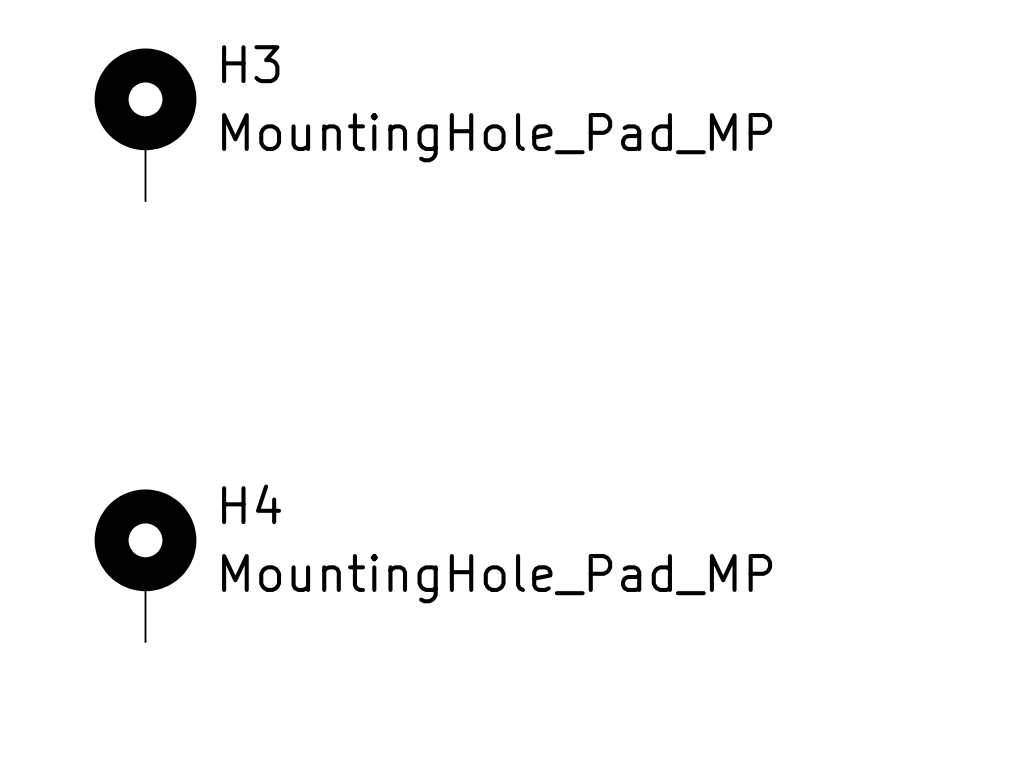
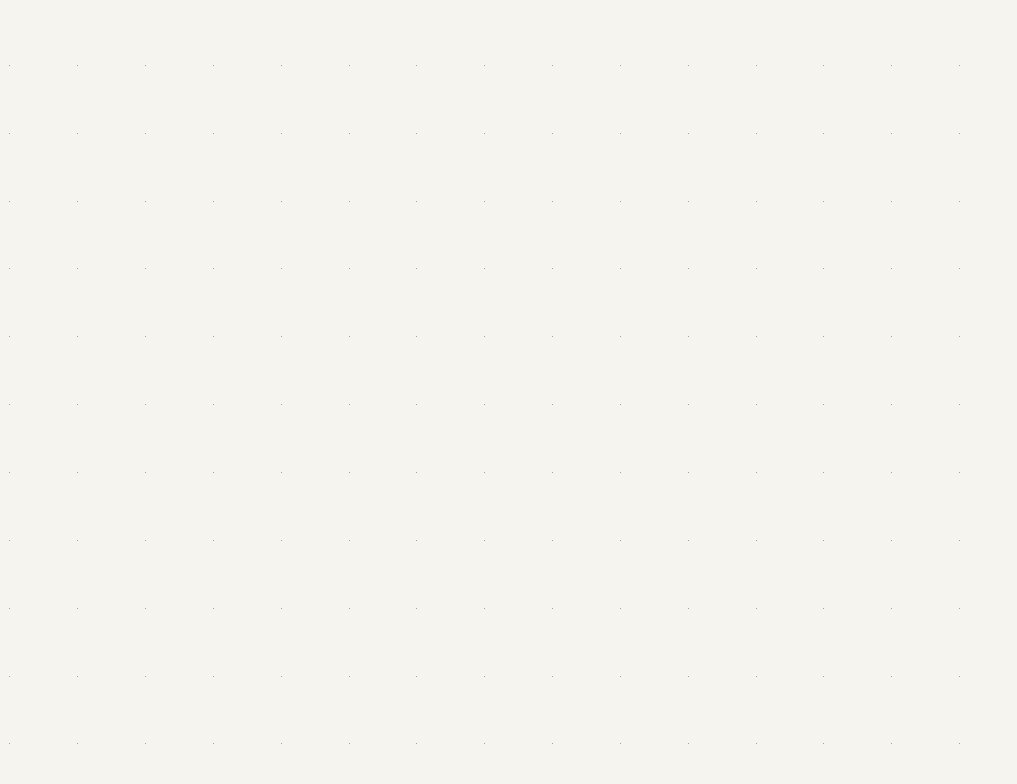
H3: MountingHole_Pad_MP (145, 124) -> none
H4: MountingHole_Pad_MP (145, 565) -> none

